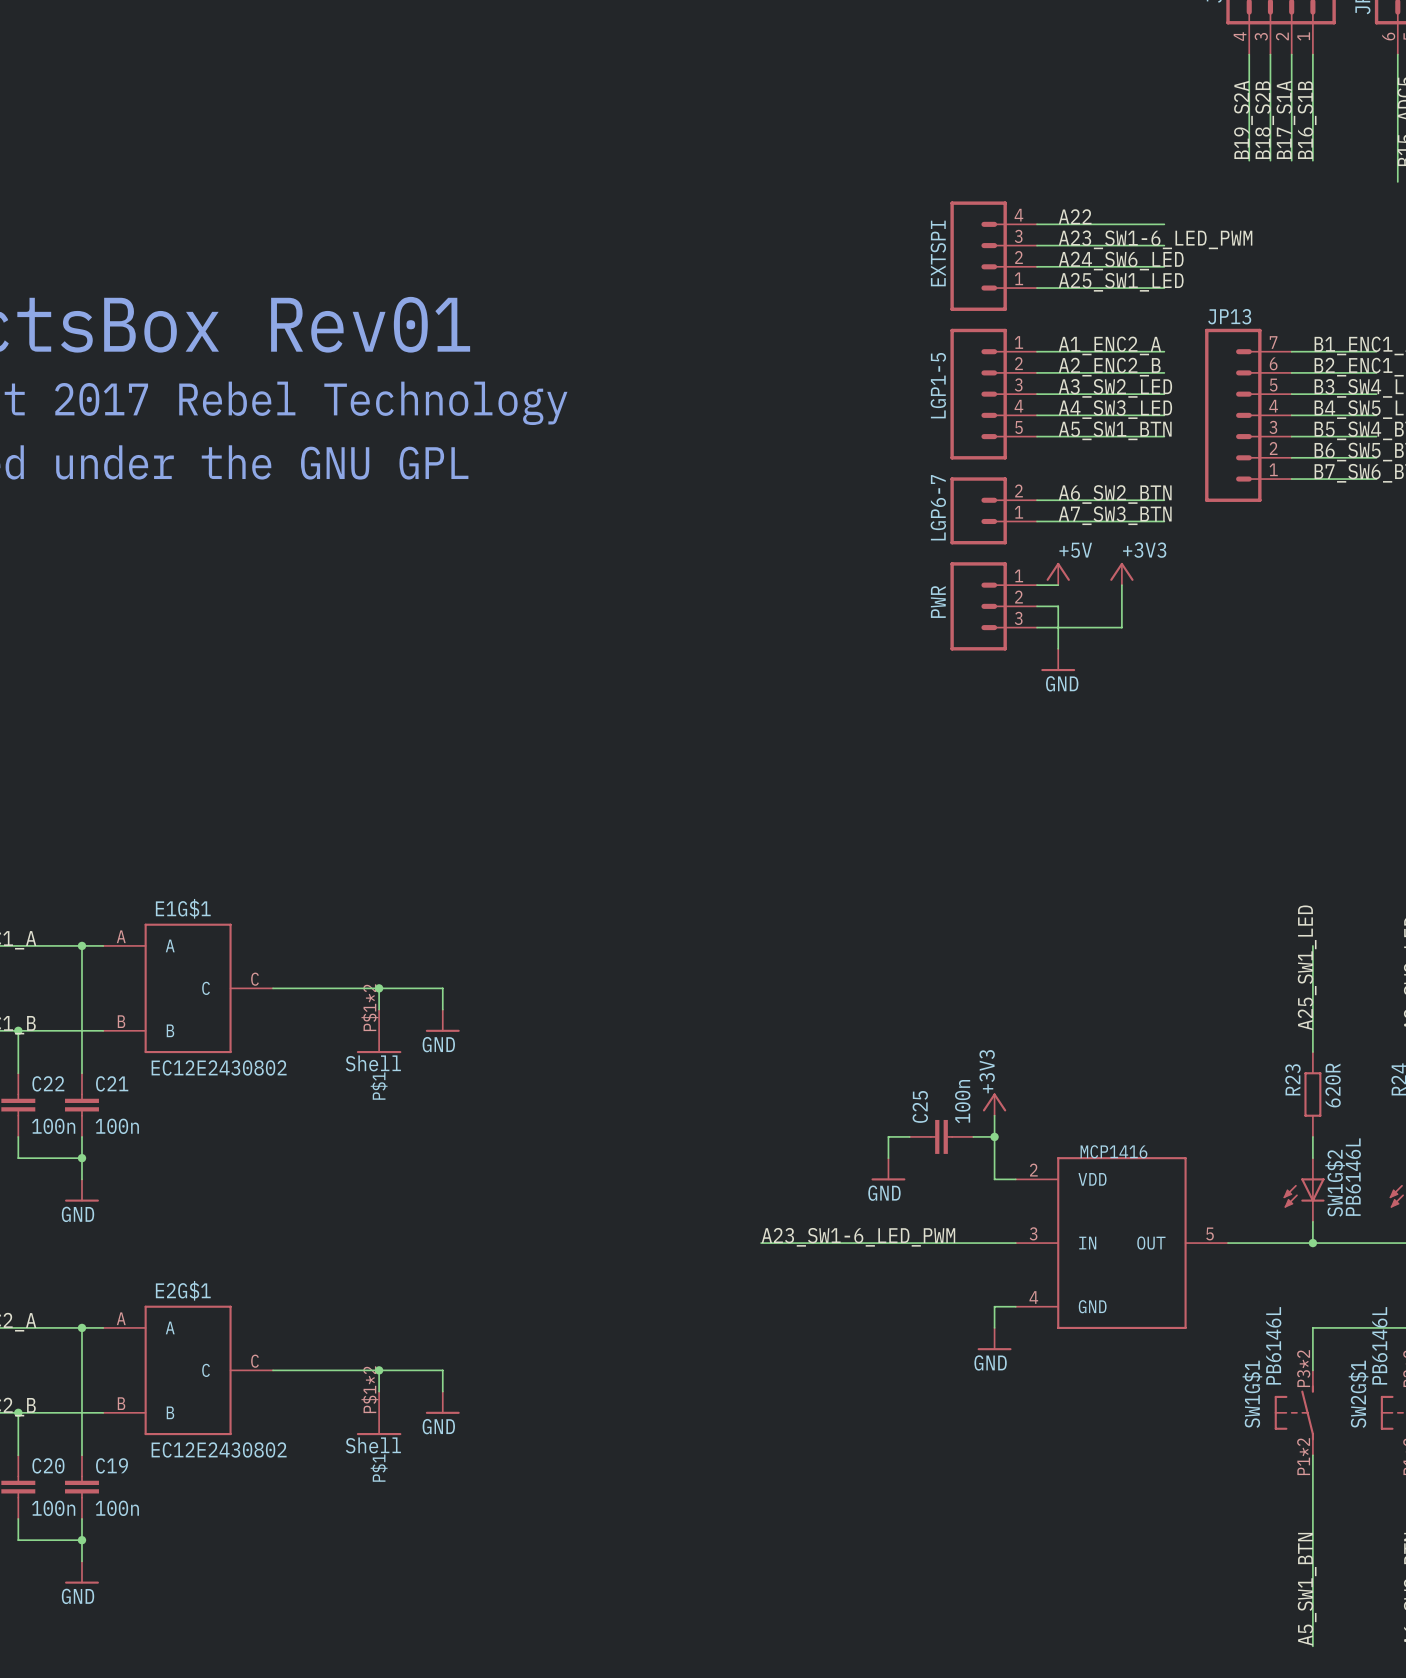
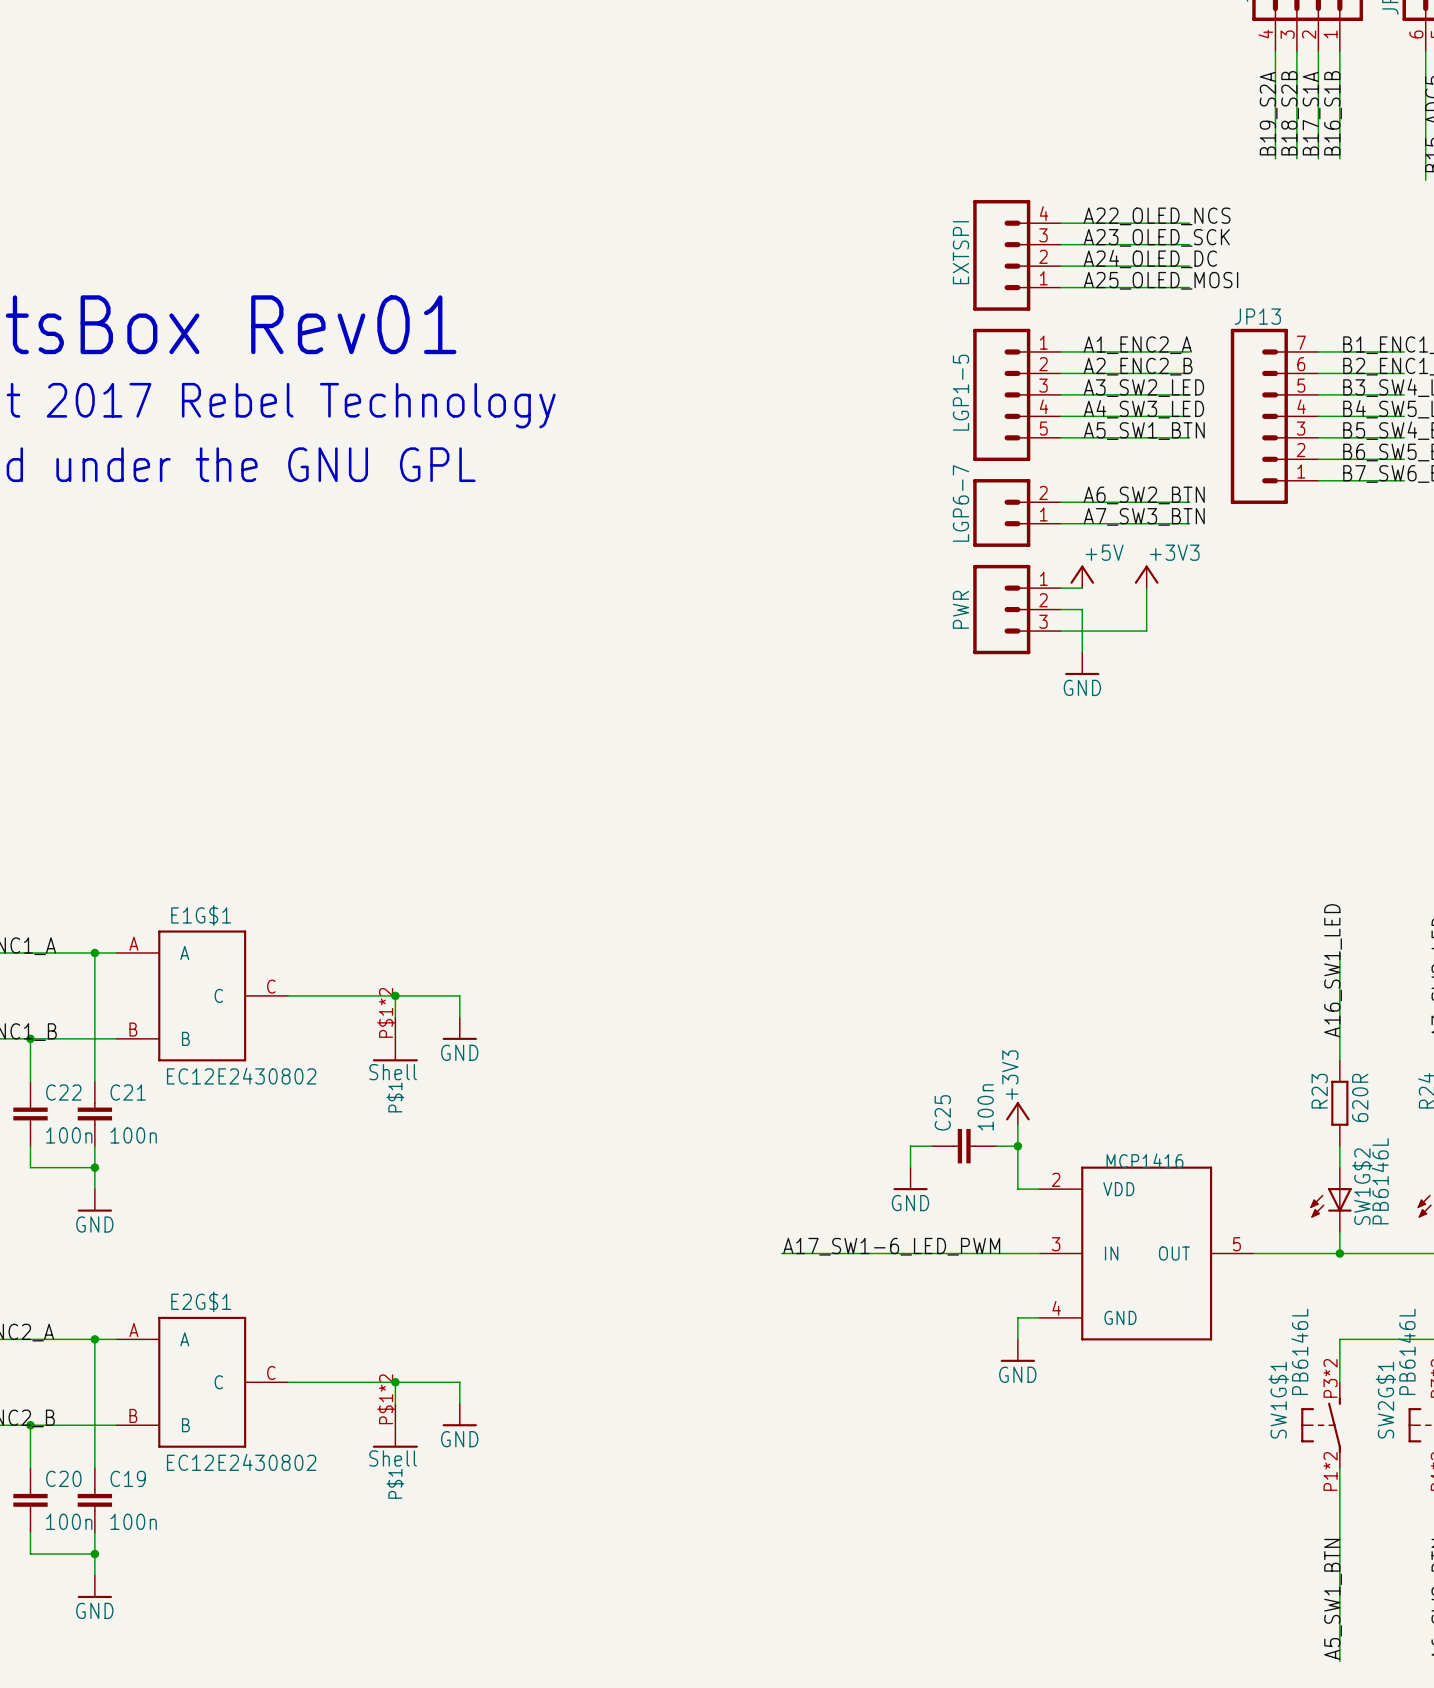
label: A22 (1075, 216) -> A22_OLED_NCS (1157, 216)
label: A23_SW1-6_LED_PWM (1155, 239) -> A23_OLED_SCK (1156, 237)
label: A24_SW6_LED (1121, 261) -> A24_OLED_DC (1150, 258)
label: A25_SW1_LED (1121, 282) -> A25_OLED_MOSI (1160, 280)
label: A25_SW1_LED (1307, 967) -> A16_SW1_LED (1333, 970)
label: A23_SW1-6_LED_PWM (858, 1237) -> A17_SW1-6_LED_PWM (891, 1246)

